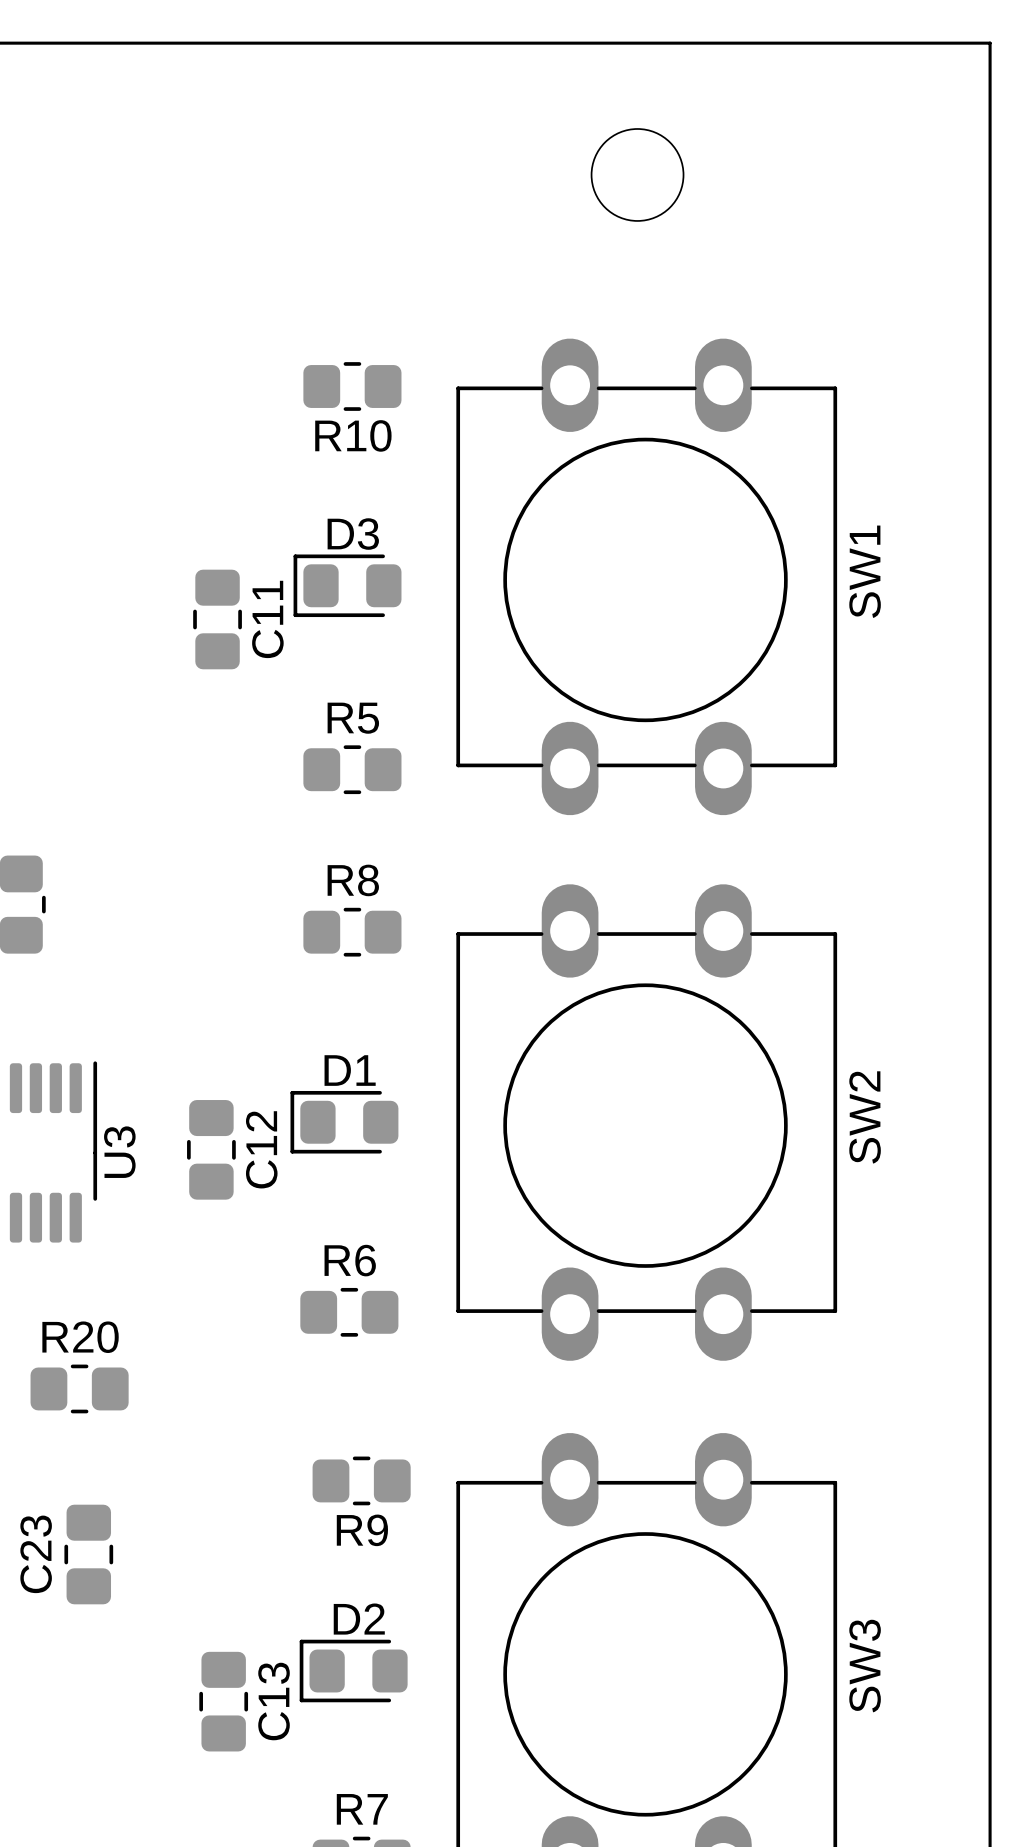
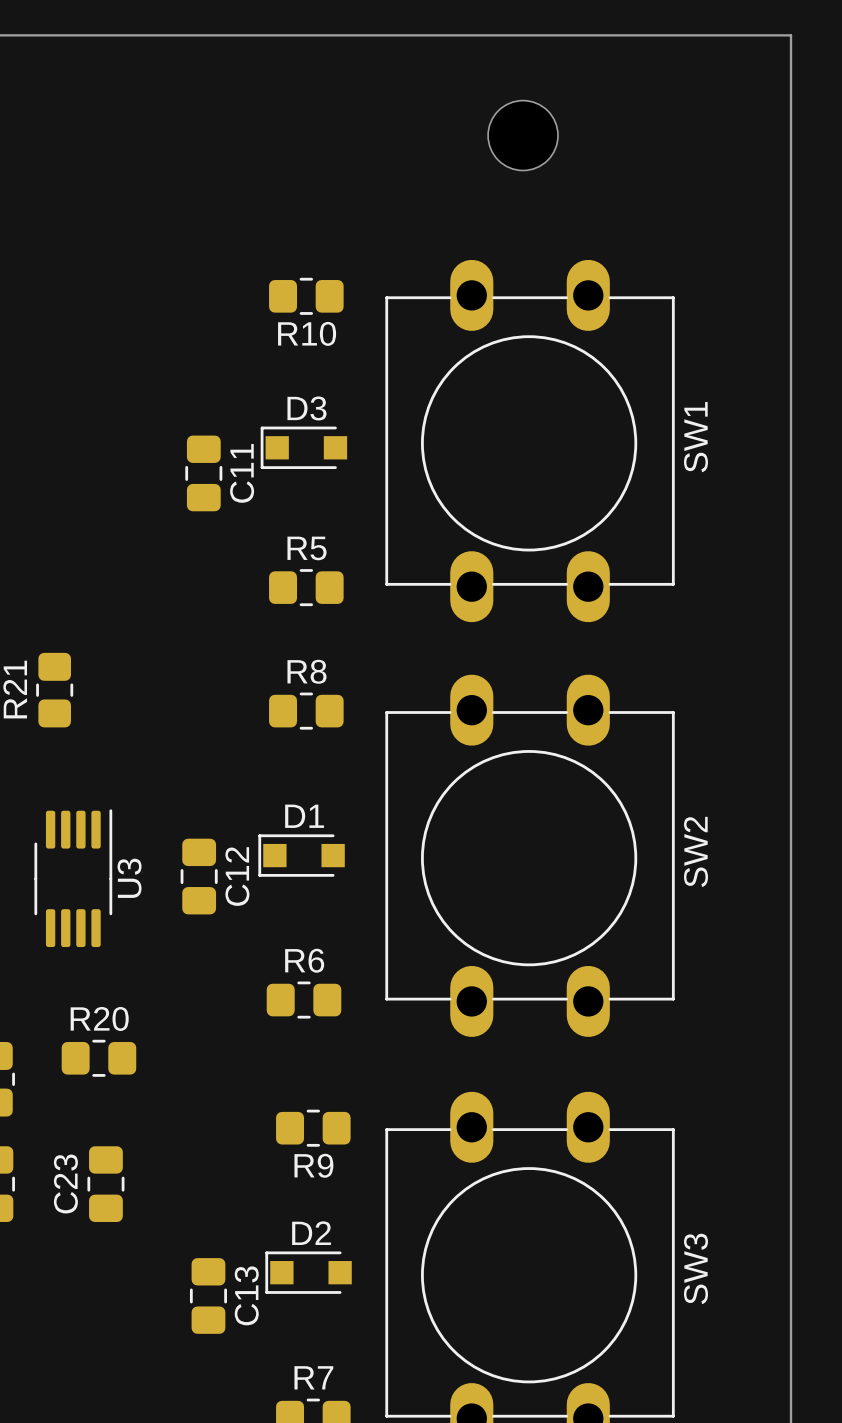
D3 footprint: [293, 554, 402, 618] -> [260, 426, 348, 470]
D1 footprint: [290, 1090, 399, 1154] -> [258, 834, 345, 877]
D2 footprint: [299, 1639, 408, 1703] -> [265, 1251, 352, 1294]

